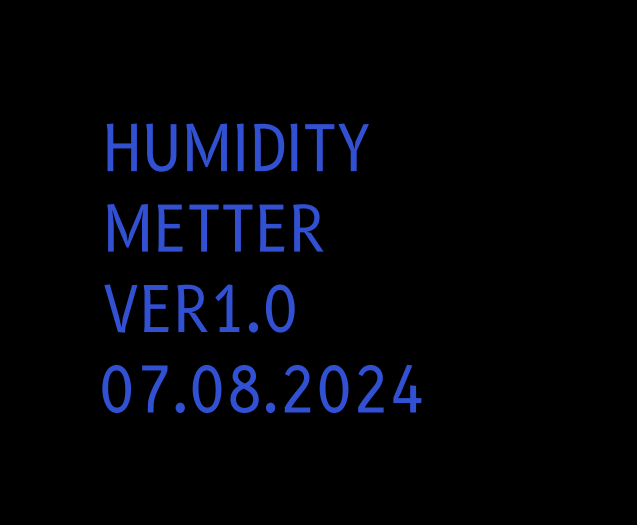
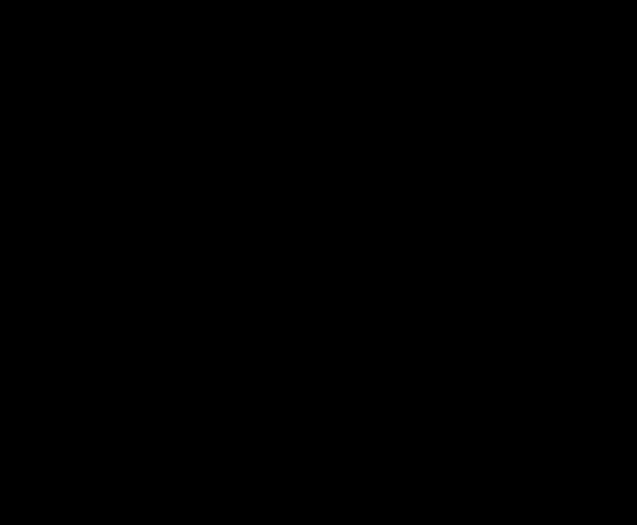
text: HUMIDITY (237, 147) -> none
text: METTER (215, 227) -> none
text: VER1.0 (199, 308) -> none
text: 07.08.2024 (261, 388) -> none

